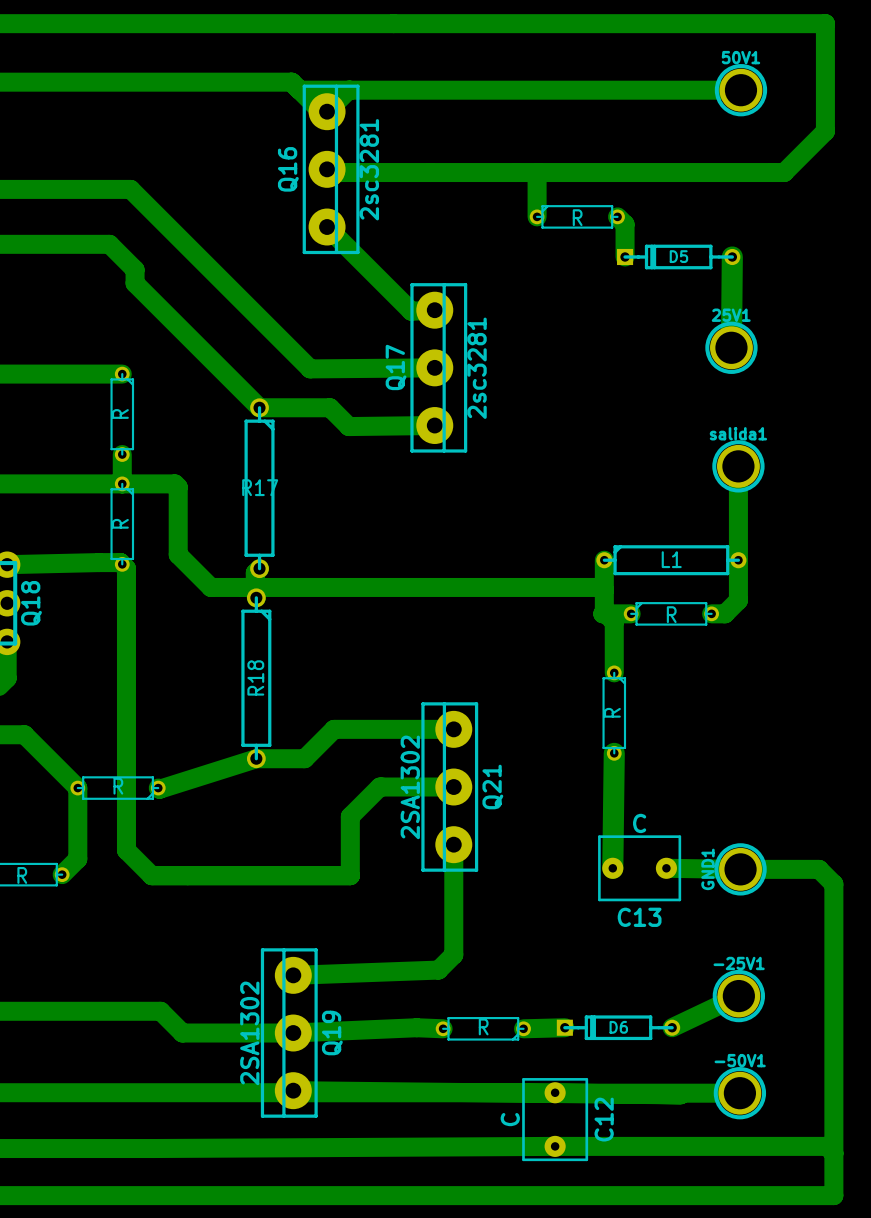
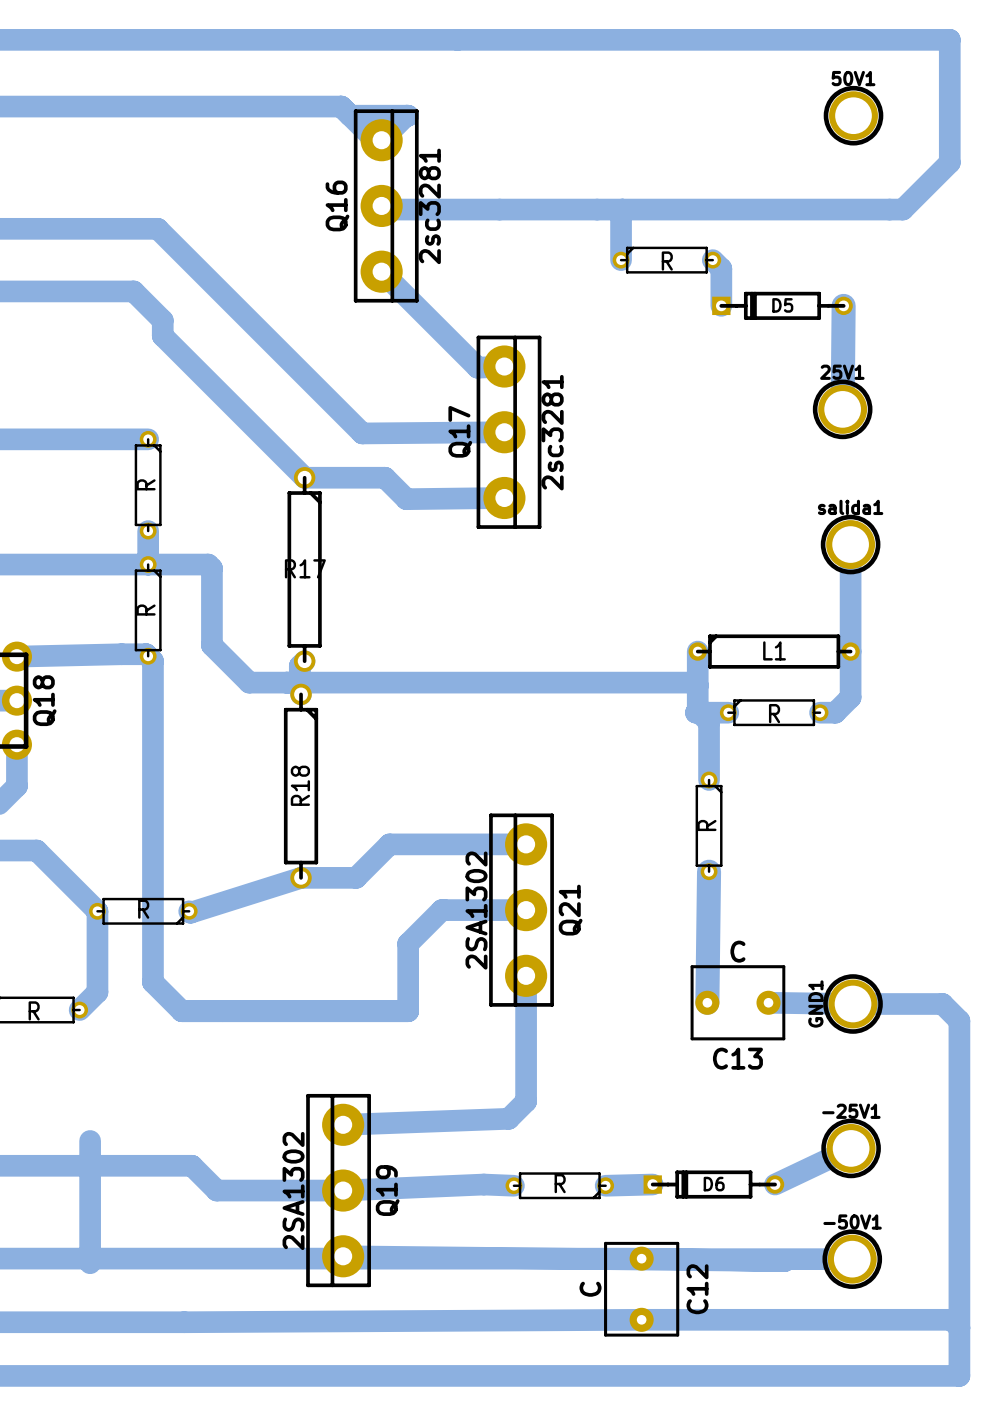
bottom track: (350, 90) (740, 90) -> none
bottom track: none -> (90, 1140) (90, 1263)

